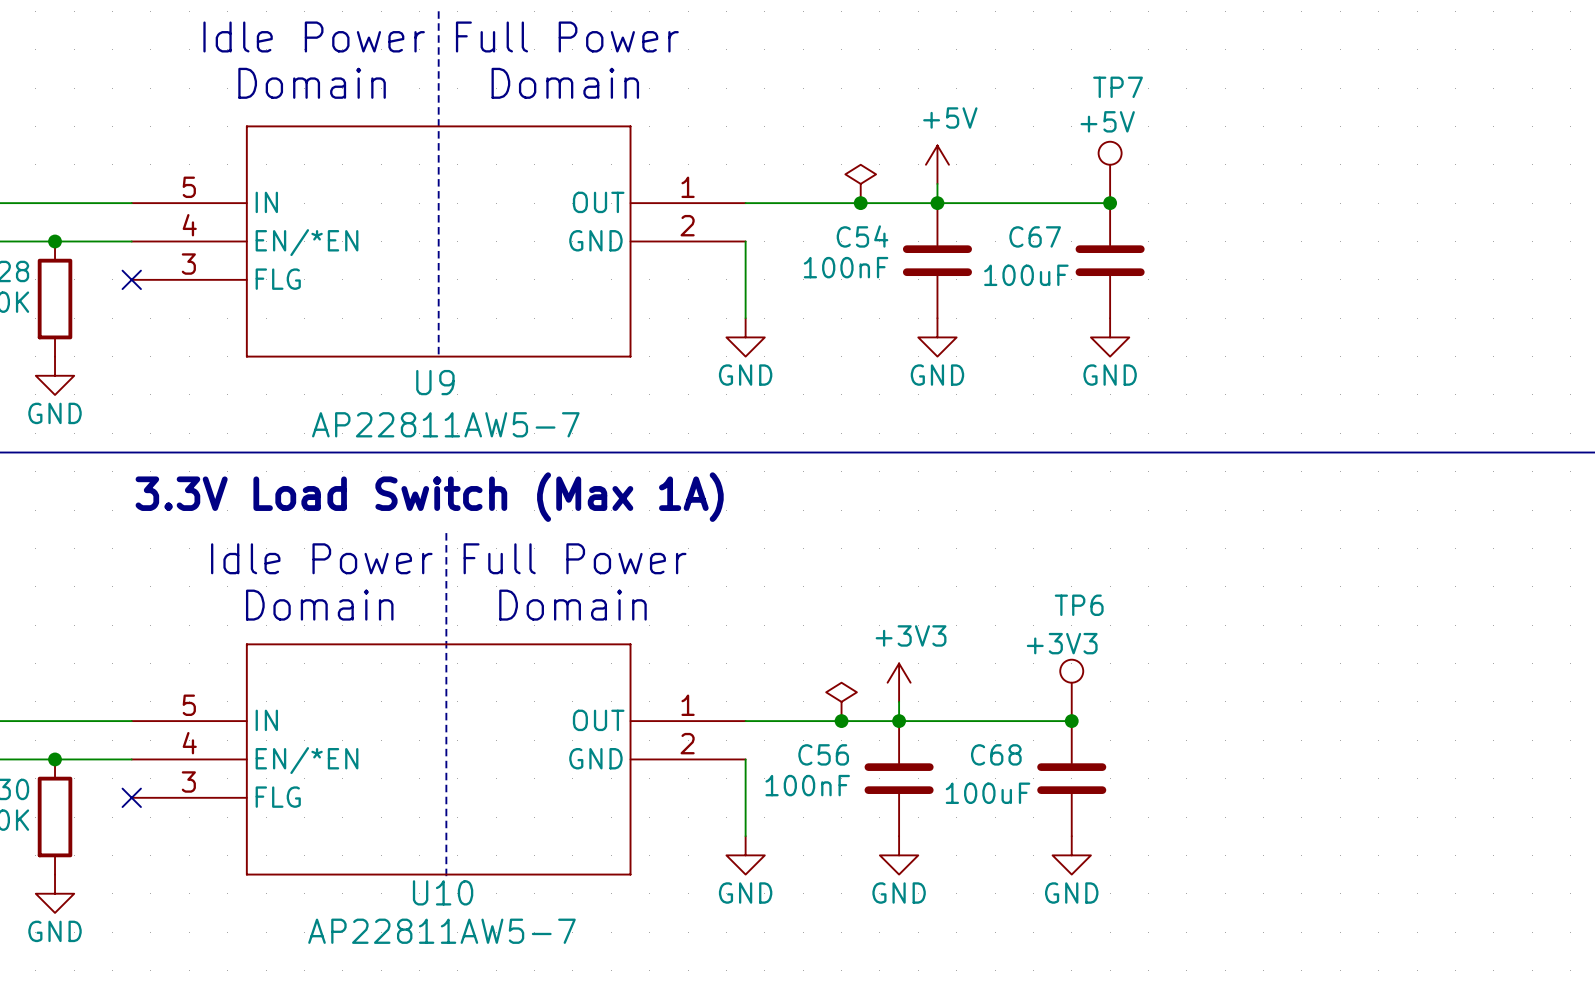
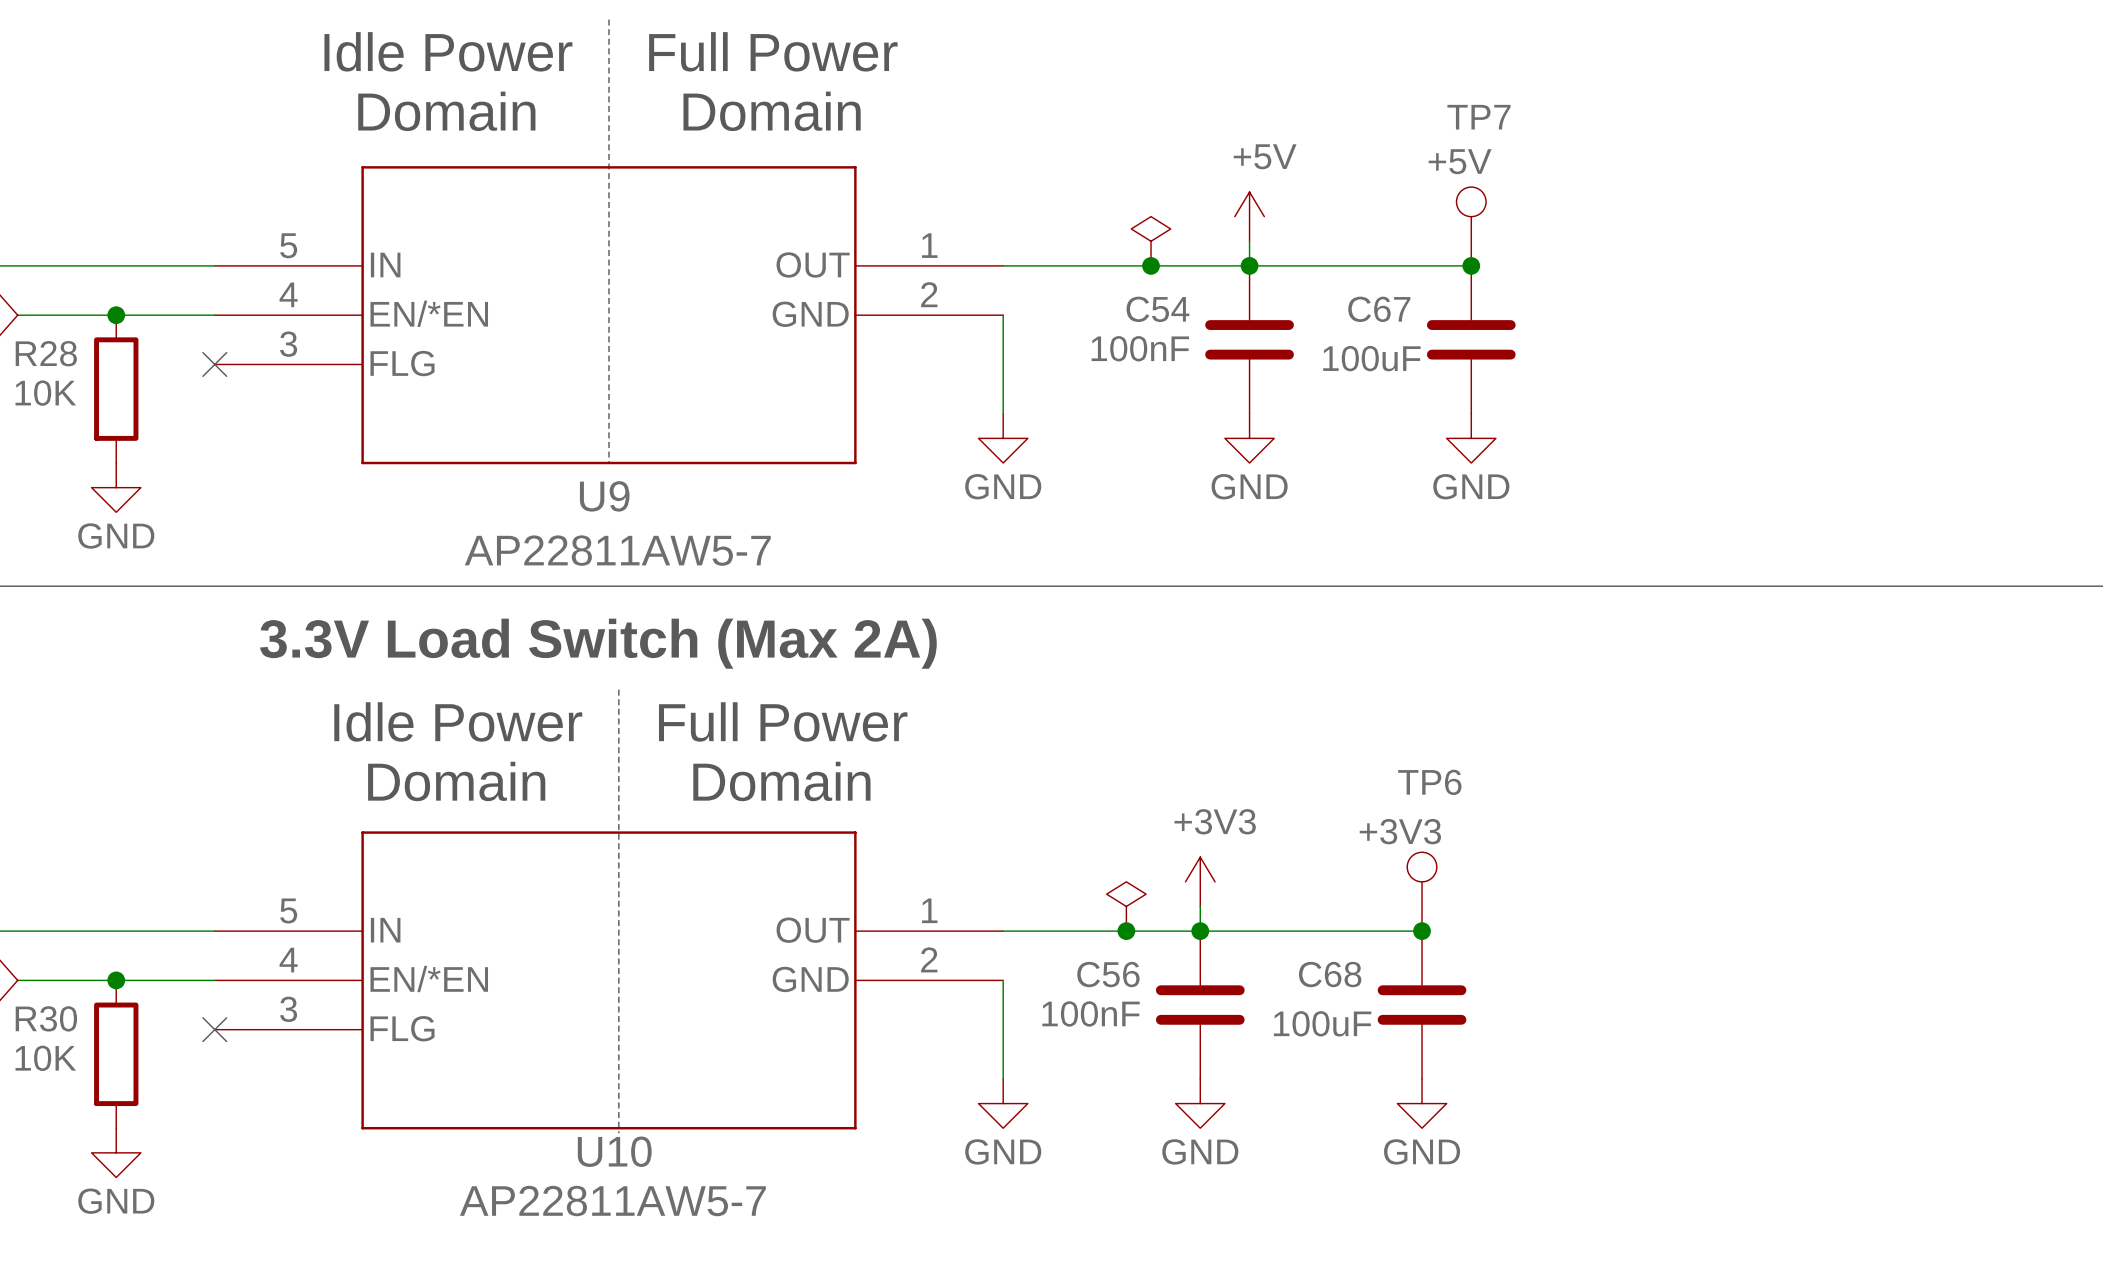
text: 3.3V Load Switch (Max 1A) (429, 497) -> 3.3V Load Switch (Max 2A) (598, 643)

